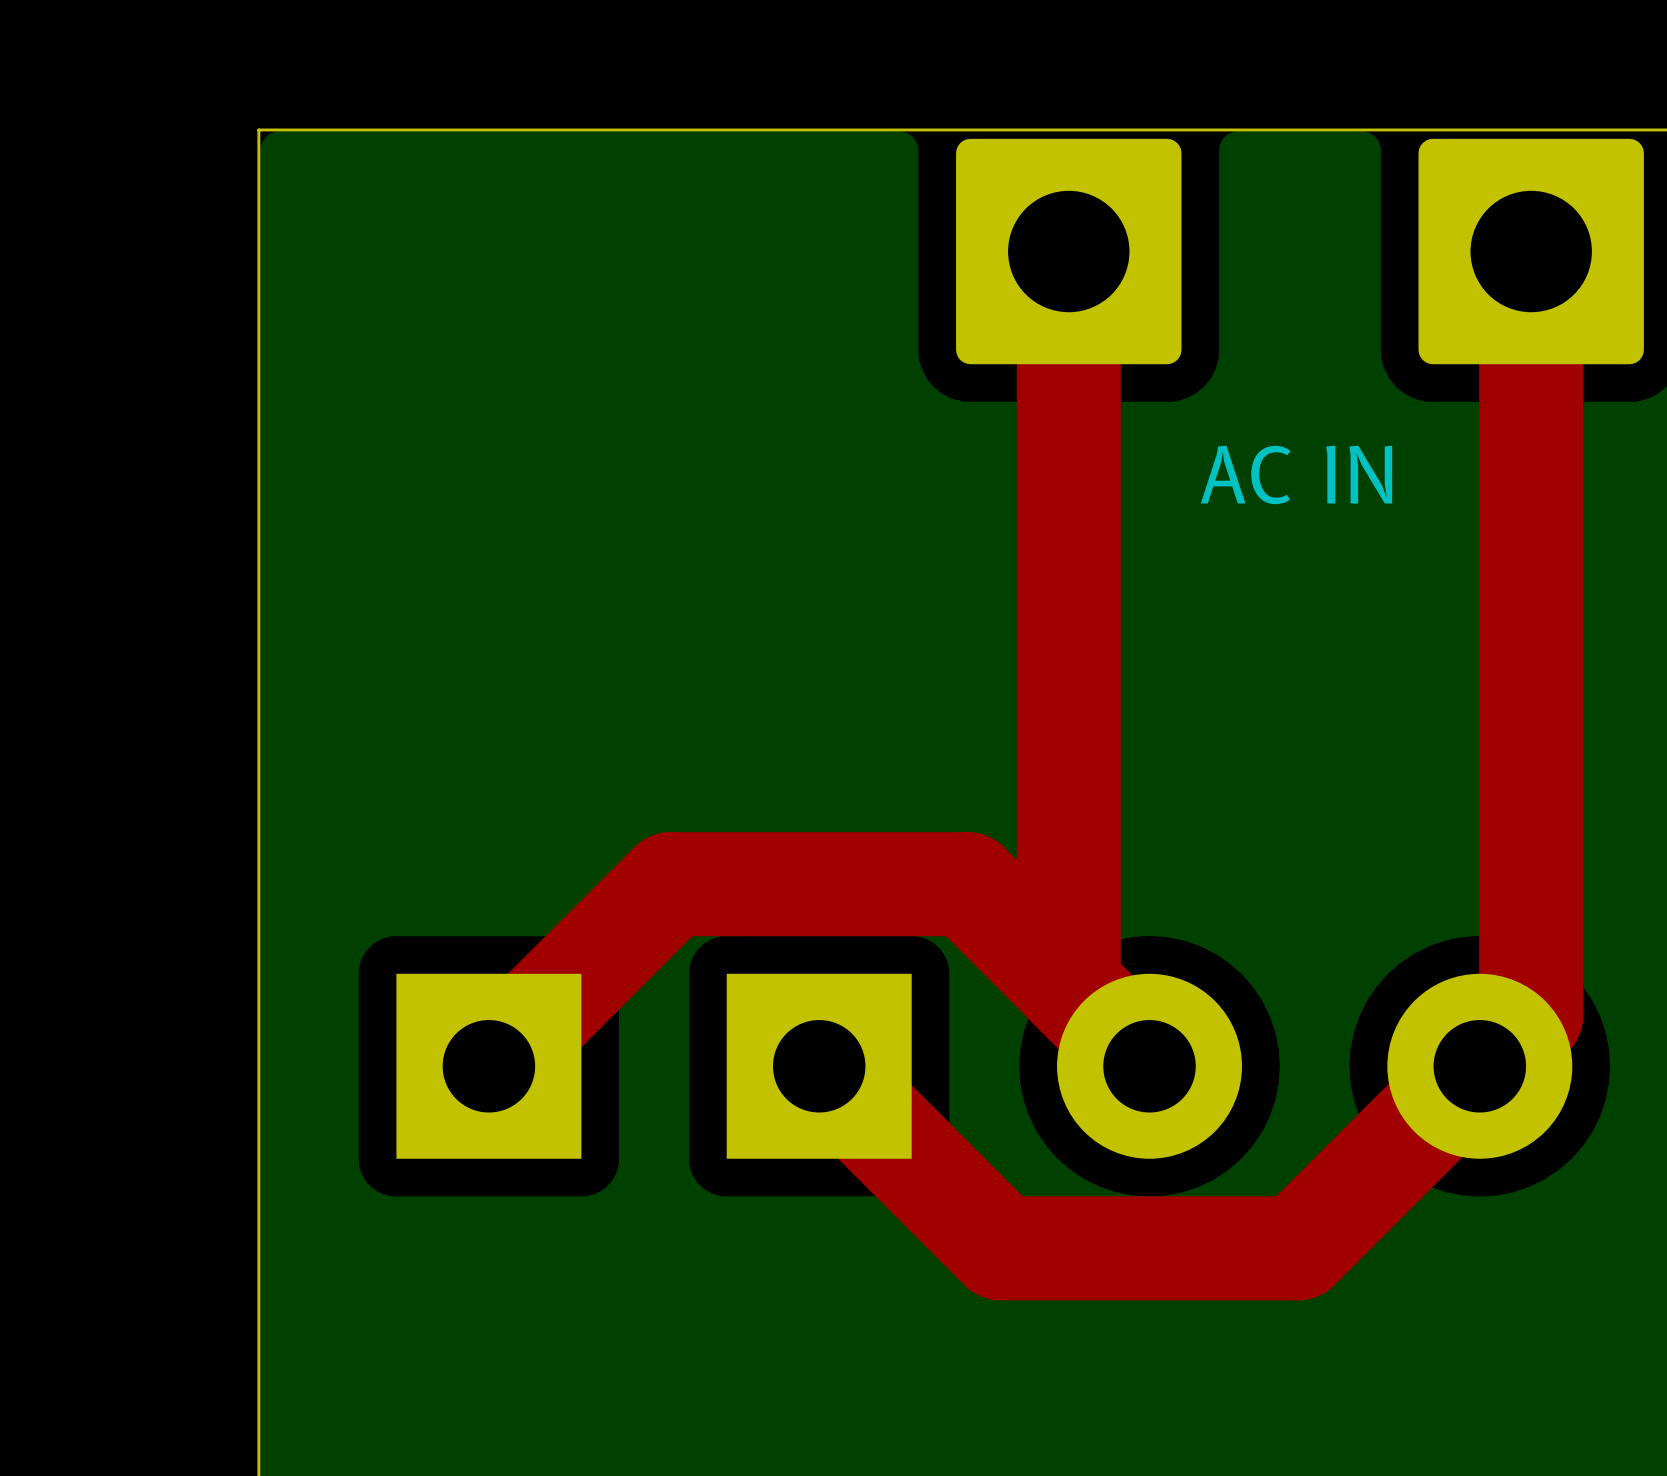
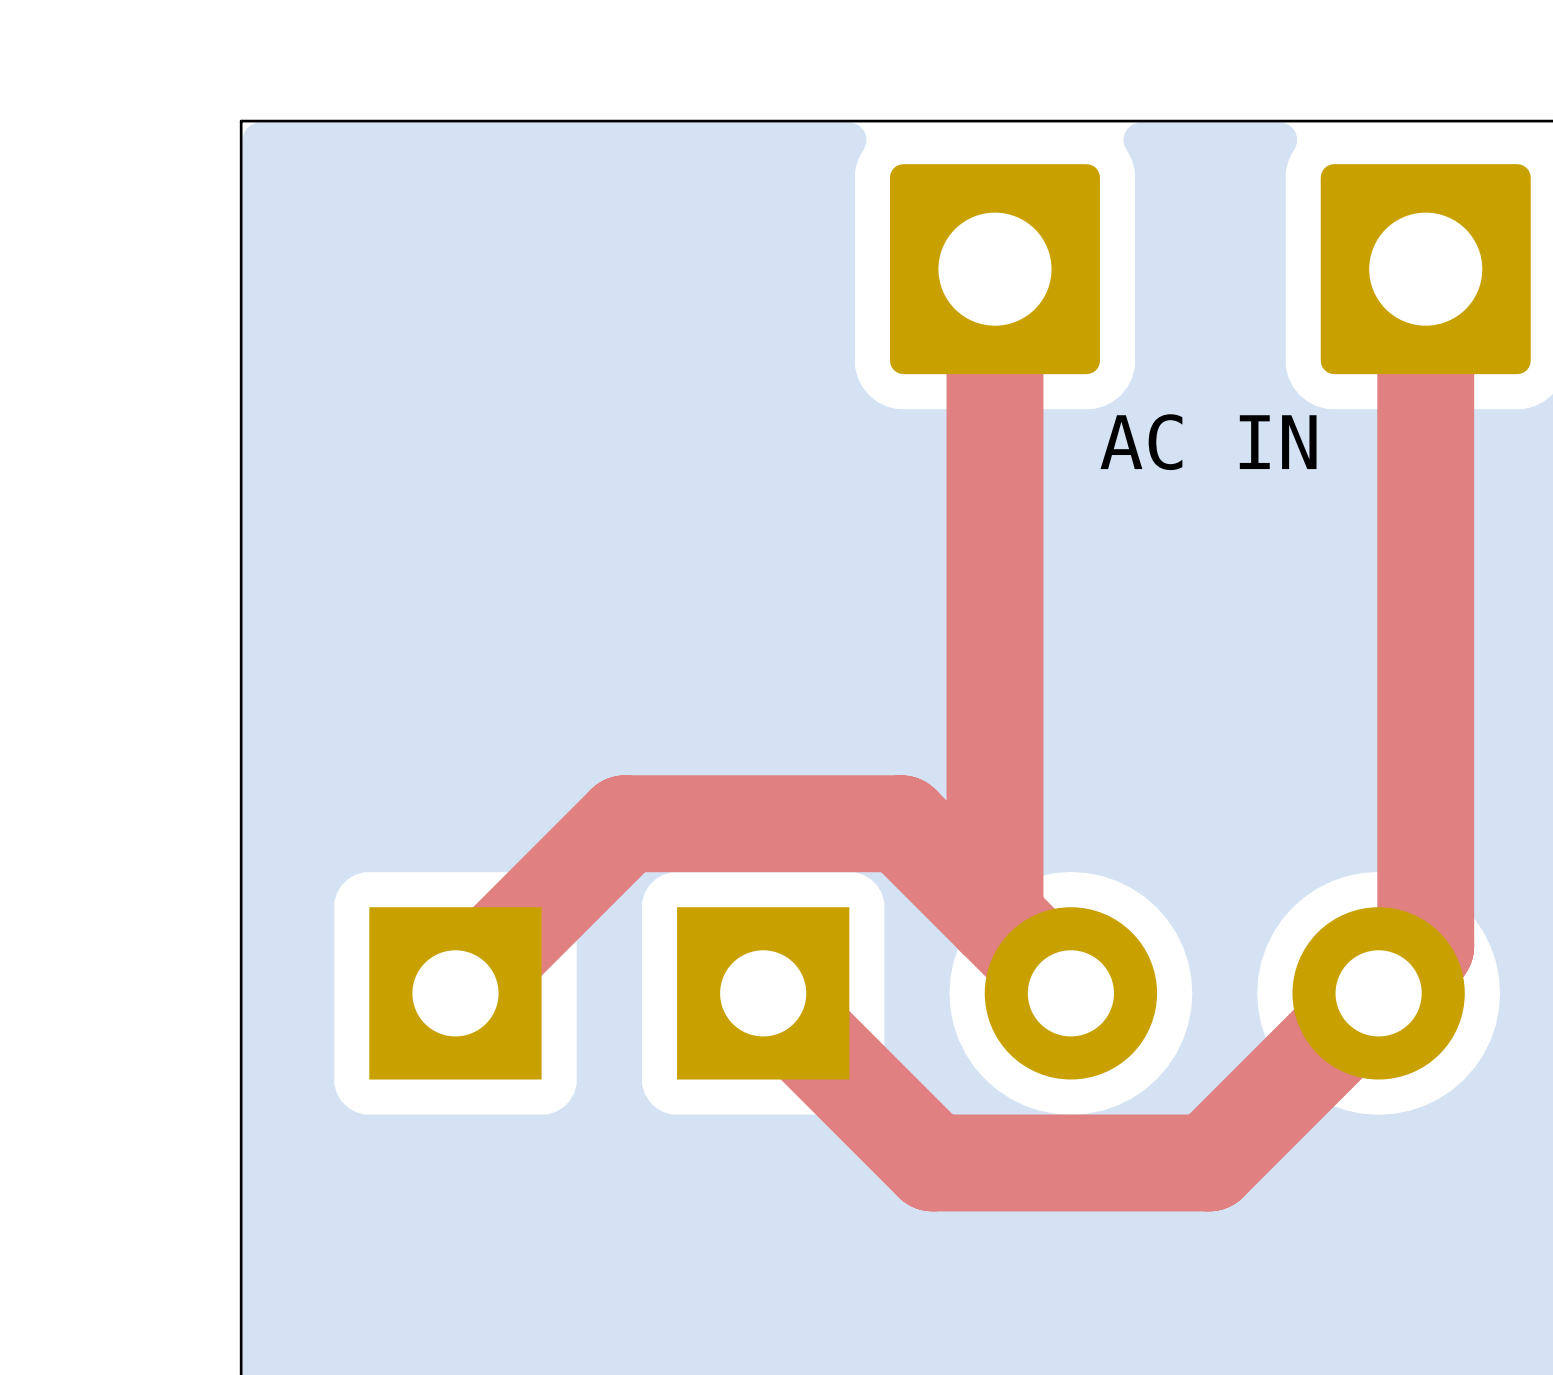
top track: (1068, 251) (1068, 985) -> (1030, 269) (994, 269) (994, 917)
part position: (1068, 251) -> (994, 269)
top track: (1531, 251) (1531, 1014) -> (1425, 269) (1425, 946)
part position: (1531, 251) -> (1425, 269)

